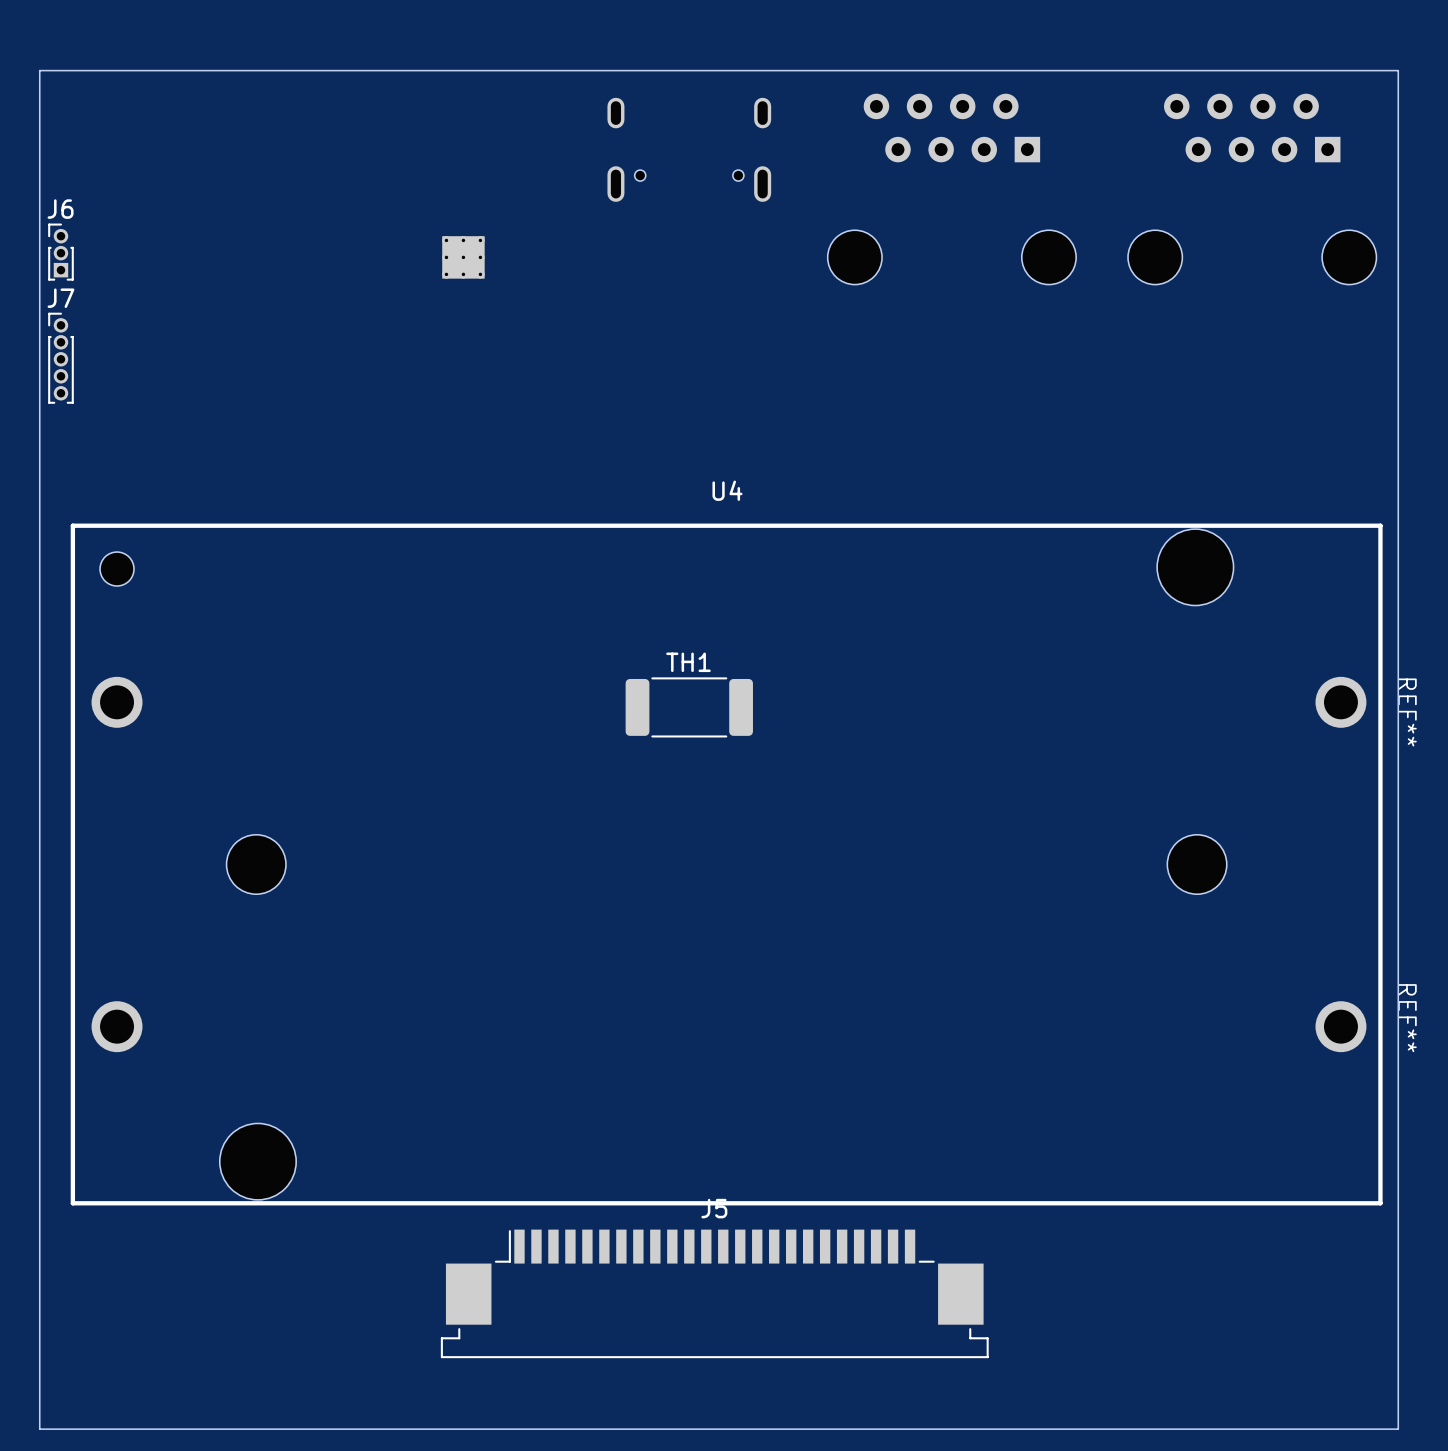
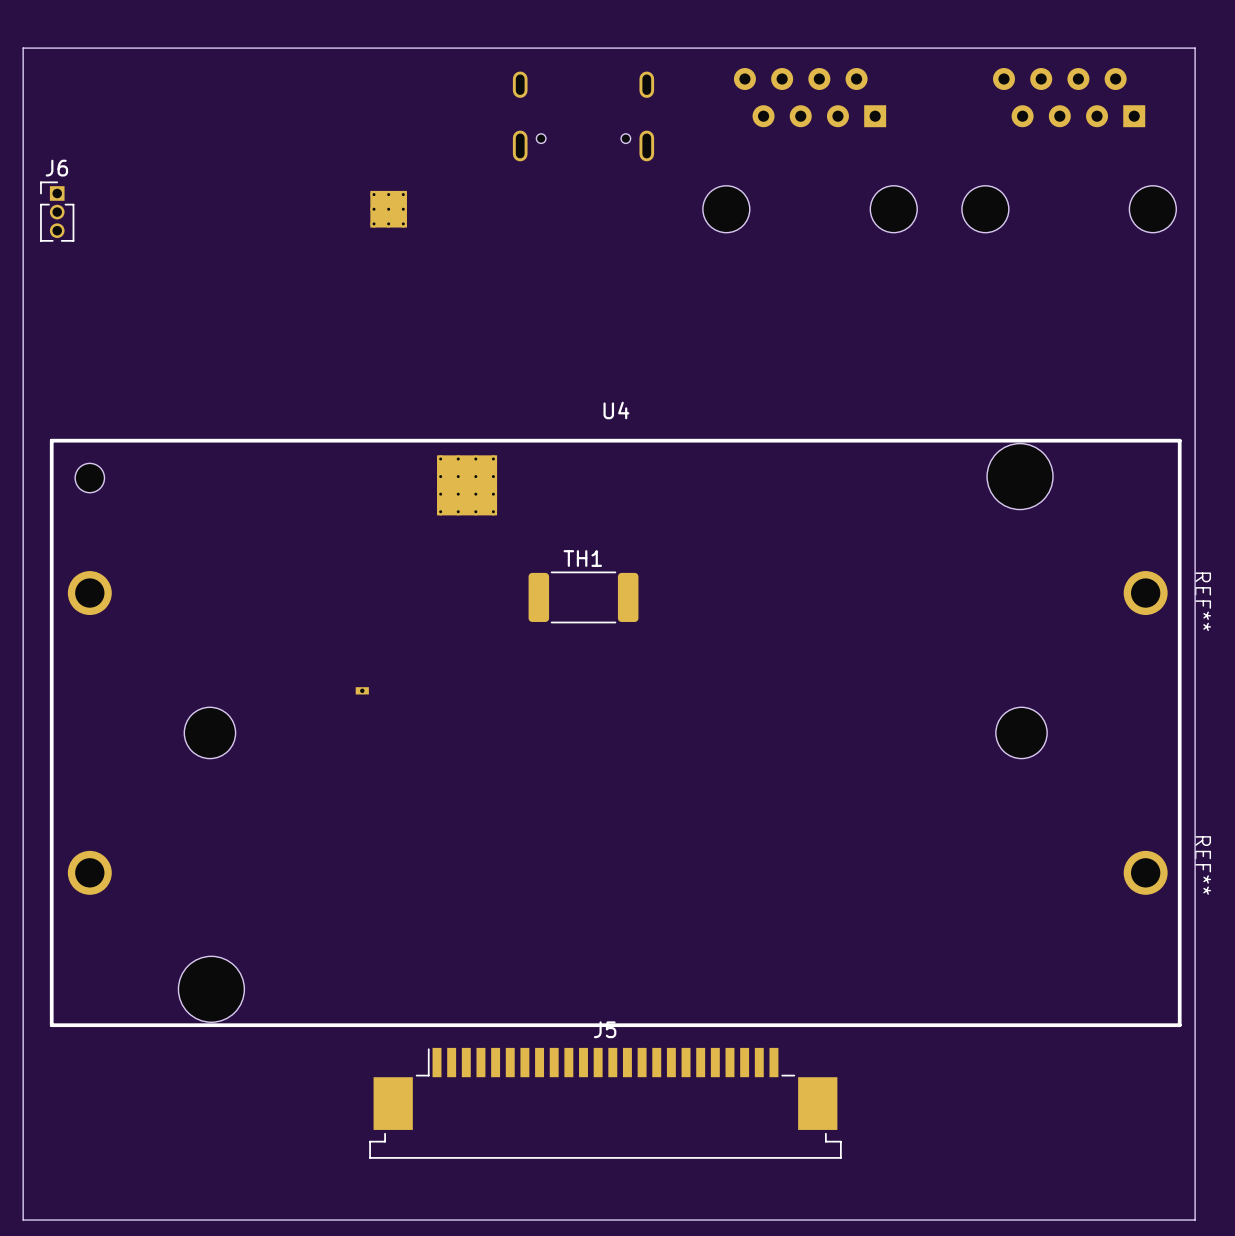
J6 footprint: [48, 223, 74, 281] -> [40, 181, 75, 242]
J7: (60, 358) -> none
part: none -> (467, 485)
part: none -> (362, 690)

